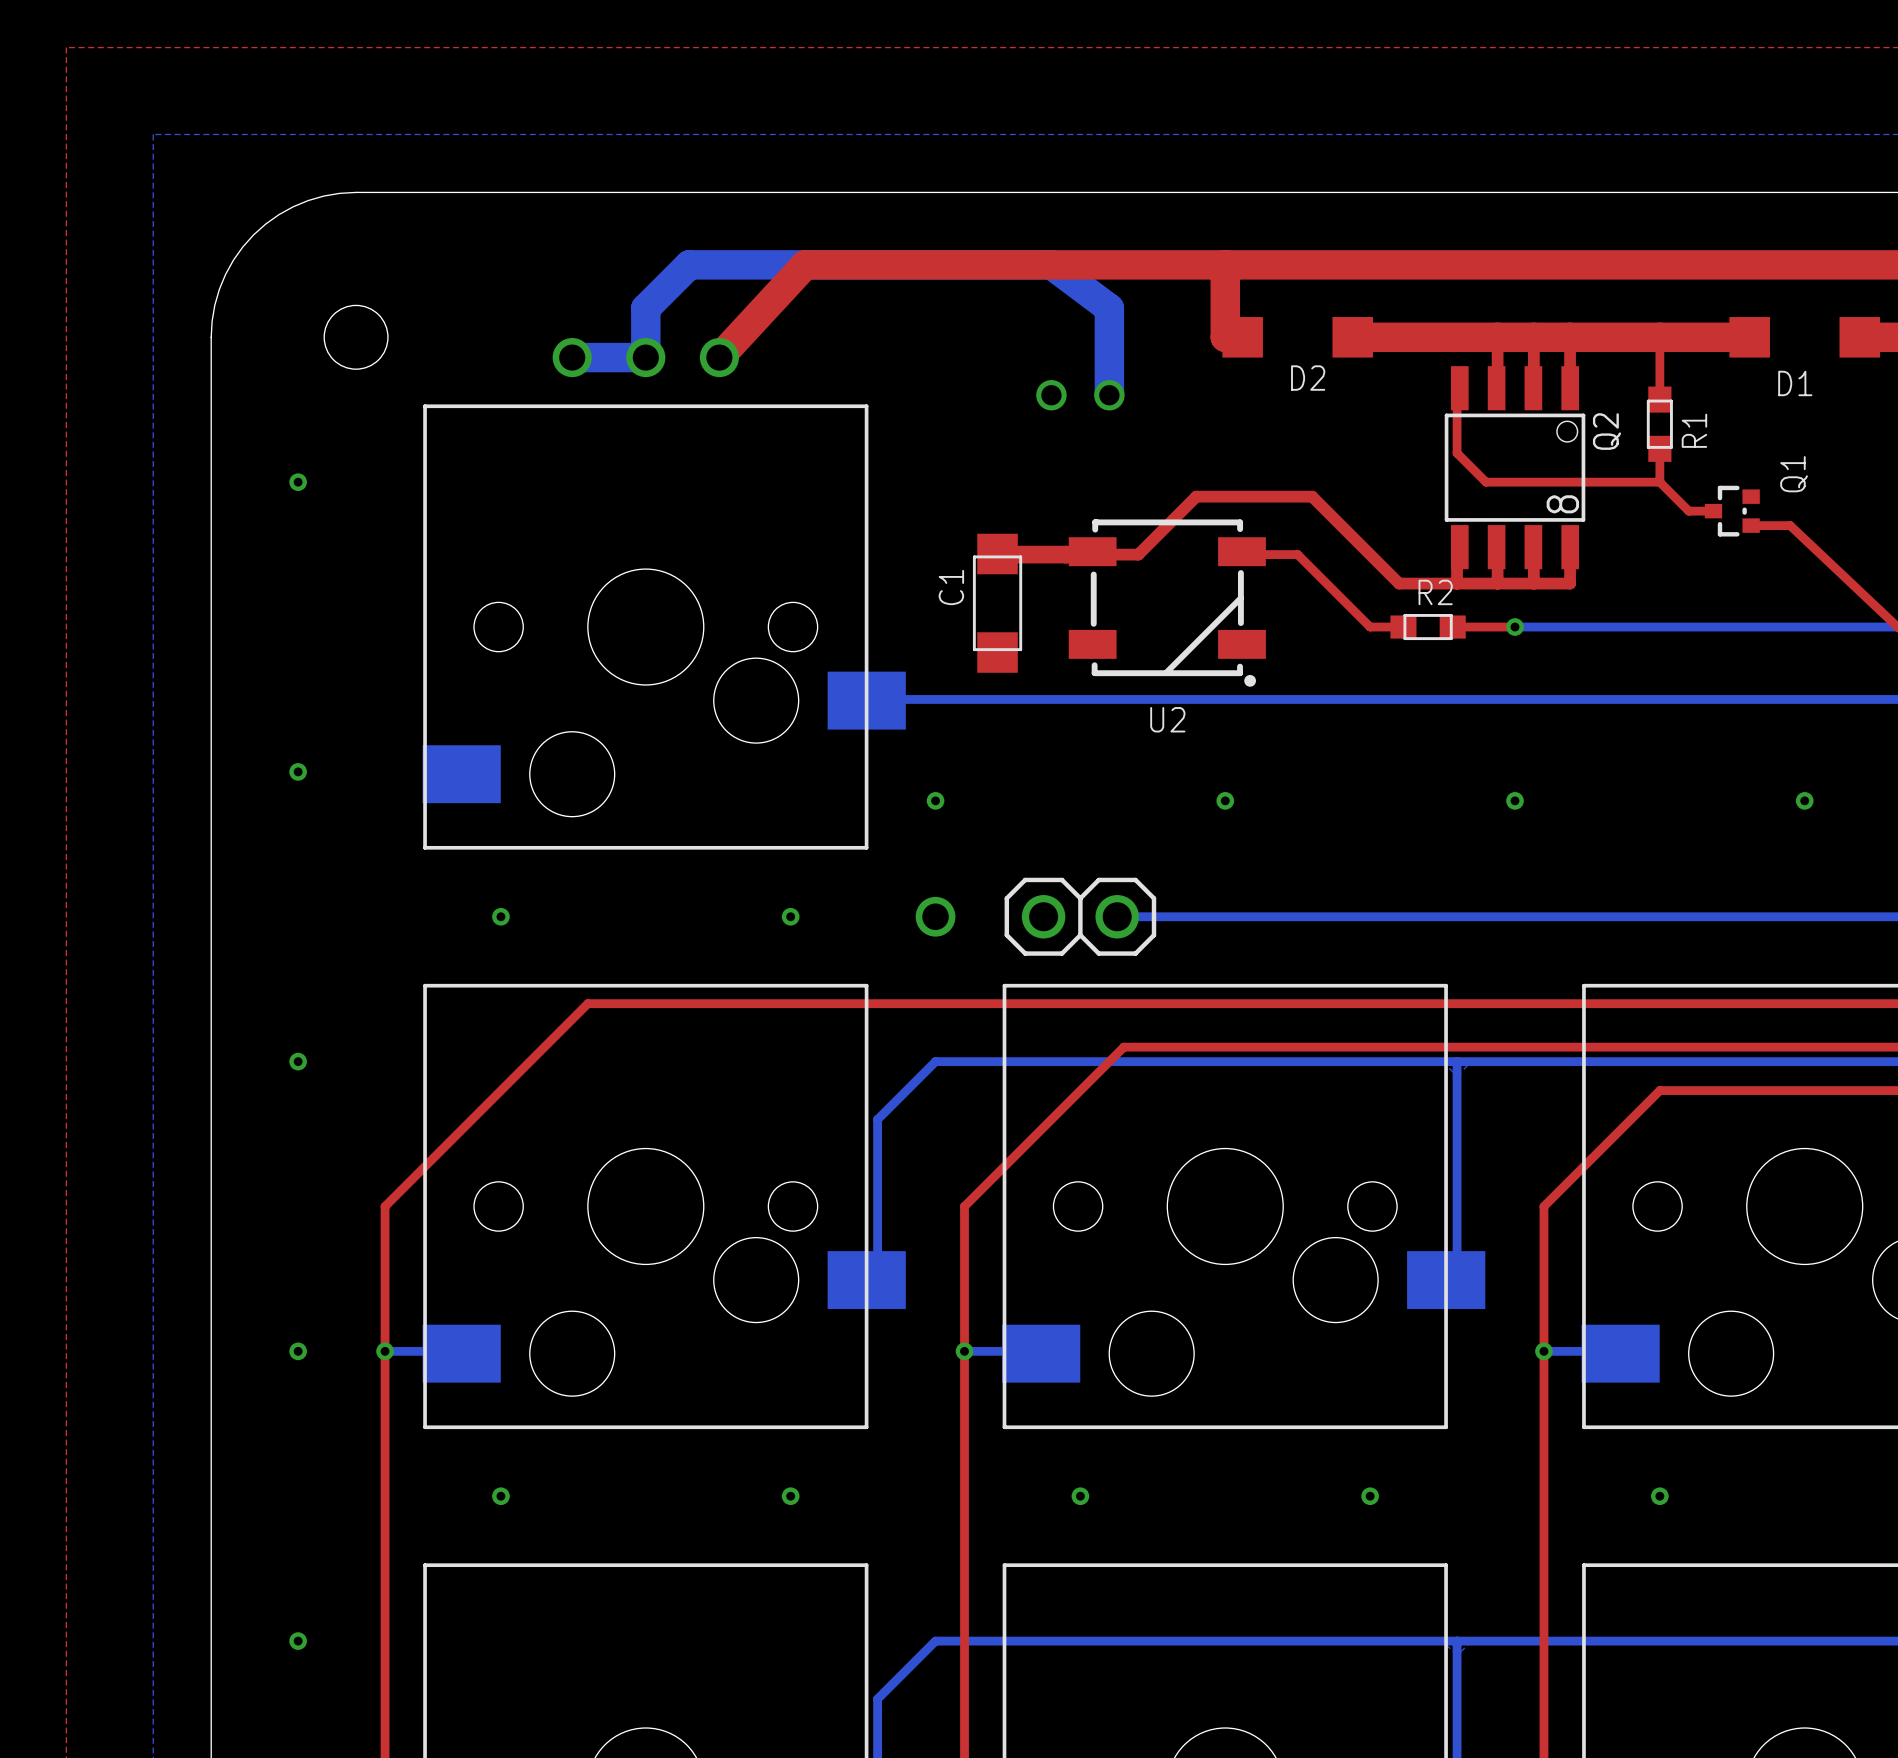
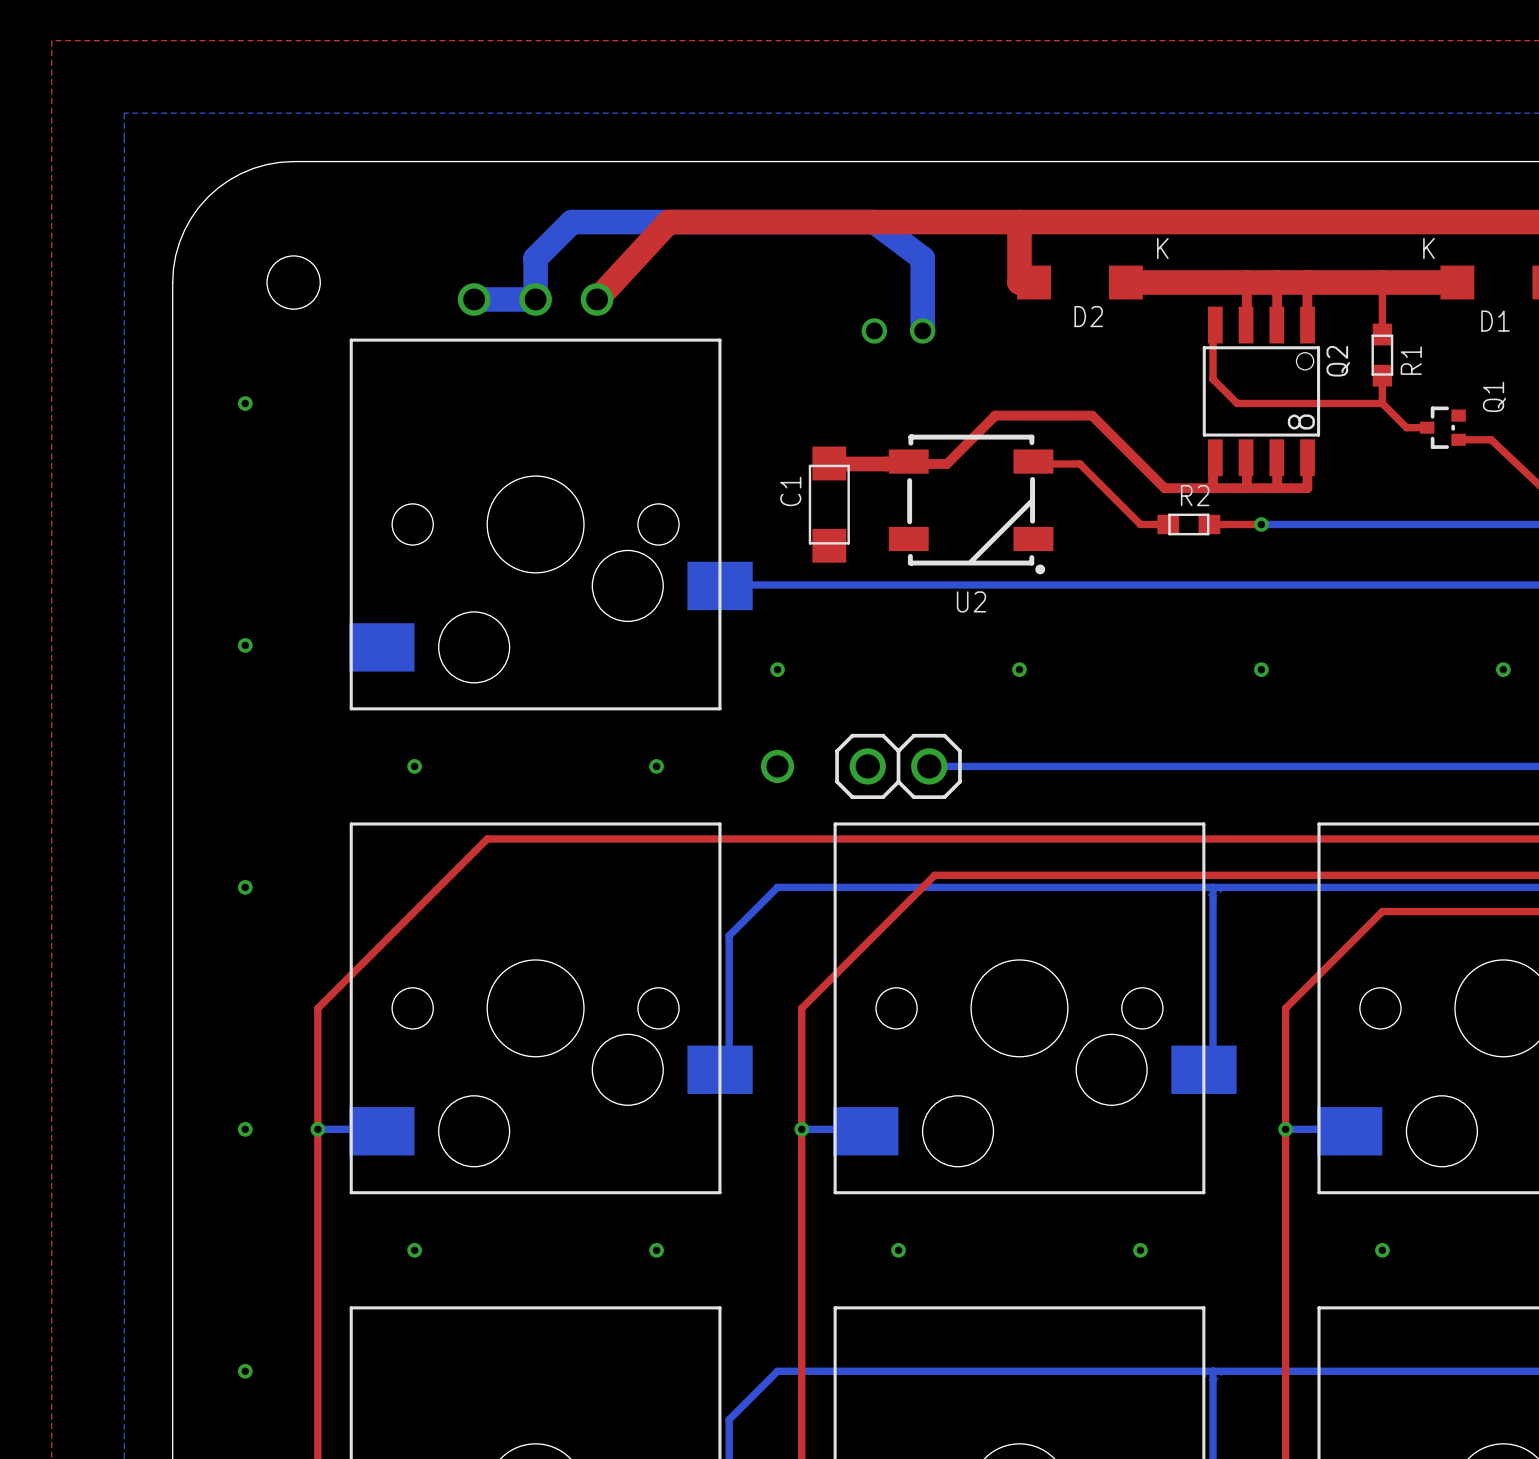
text: none -> K (1162, 248)
text: none -> K (1428, 248)

